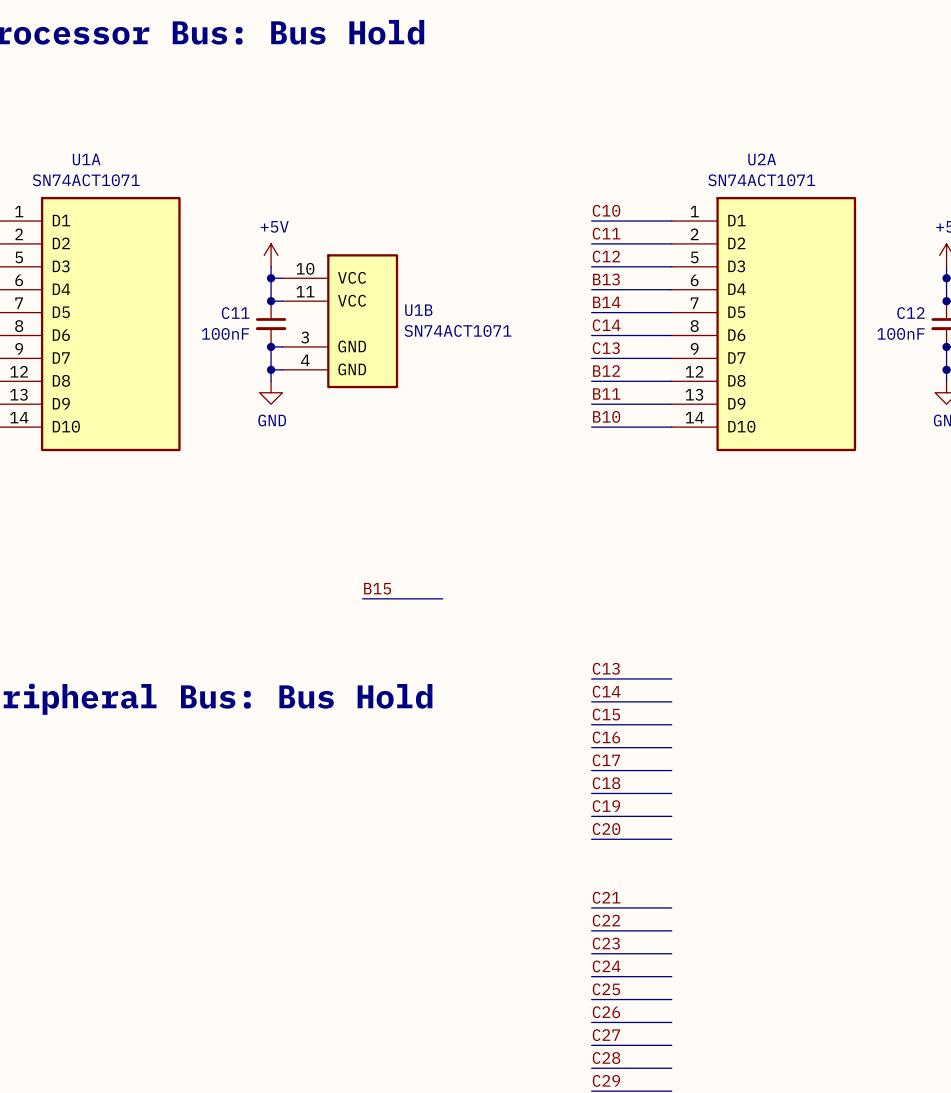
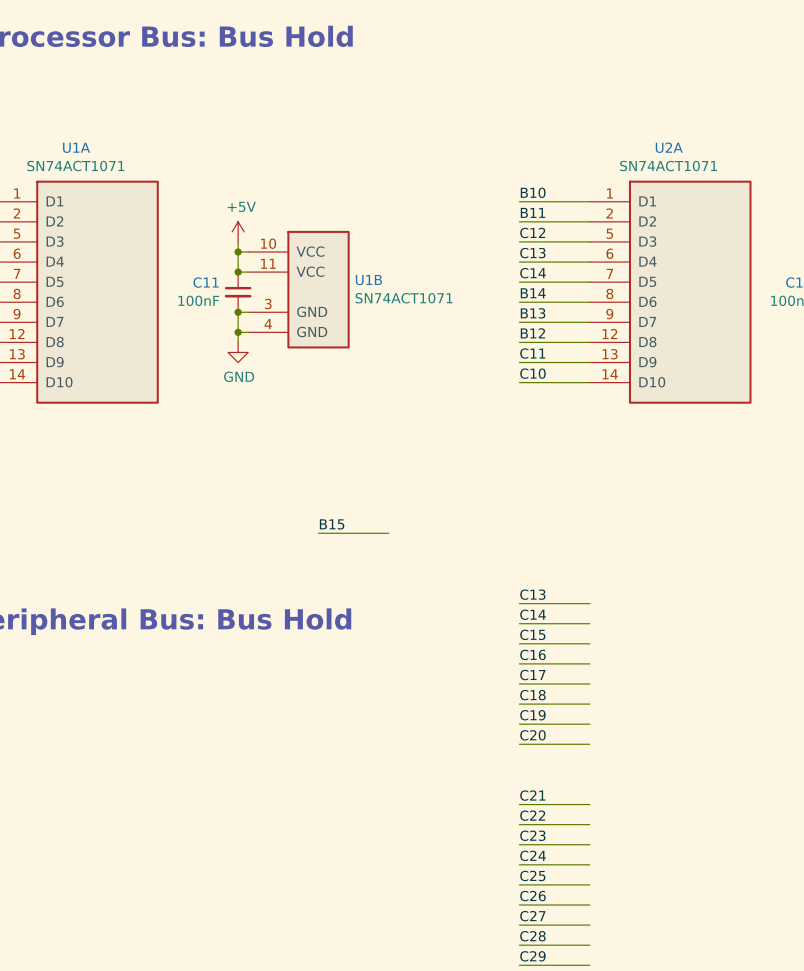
label: C10 (606, 210) -> B10 (533, 192)
label: C11 (606, 233) -> B11 (532, 212)
label: B13 (606, 279) -> C13 (532, 253)
label: B14 (606, 302) -> C14 (533, 273)
label: C14 (606, 325) -> B14 (533, 293)
label: C13 (606, 348) -> B13 (533, 313)
label: B11 (606, 393) -> C11 (532, 353)
label: B10 (606, 416) -> C10 (532, 373)

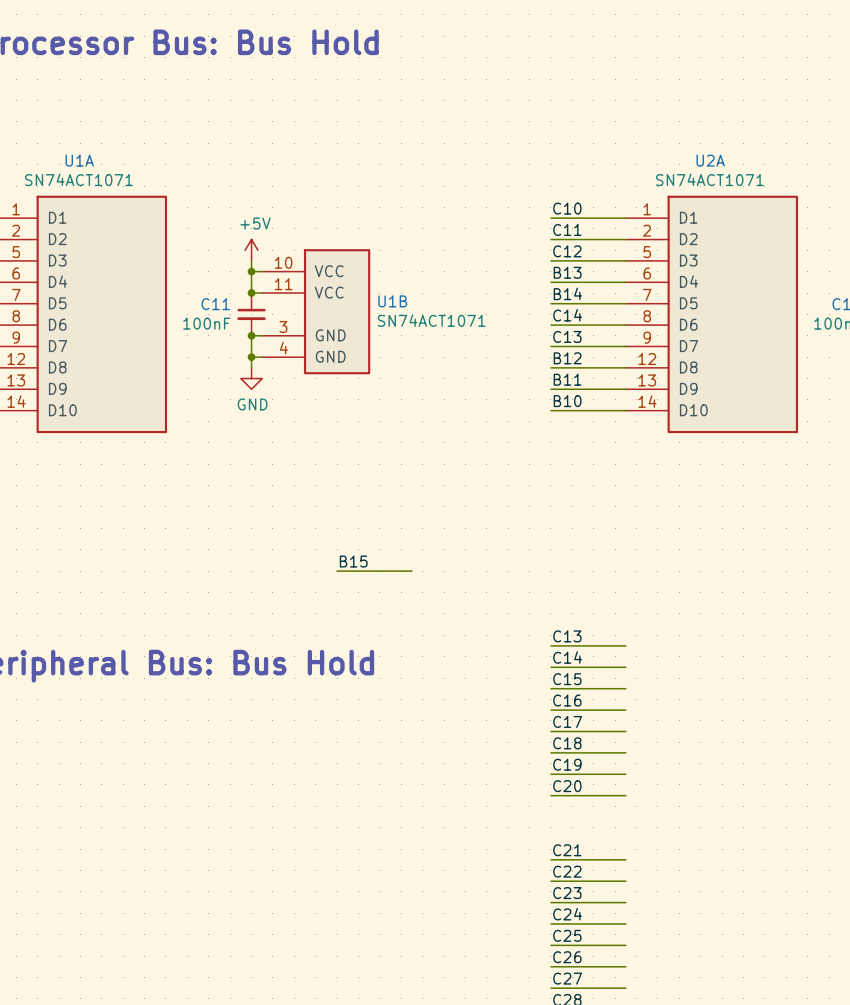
label: B10 (533, 192) -> C10 (567, 208)
label: B11 (532, 212) -> C11 (567, 229)
label: C13 (532, 253) -> B13 (567, 272)
label: C14 (533, 273) -> B14 (567, 293)
label: B14 (533, 293) -> C14 (567, 315)
label: B13 (533, 313) -> C13 (567, 336)
label: C11 (532, 353) -> B11 (567, 379)
label: C10 (532, 373) -> B10 (567, 401)

